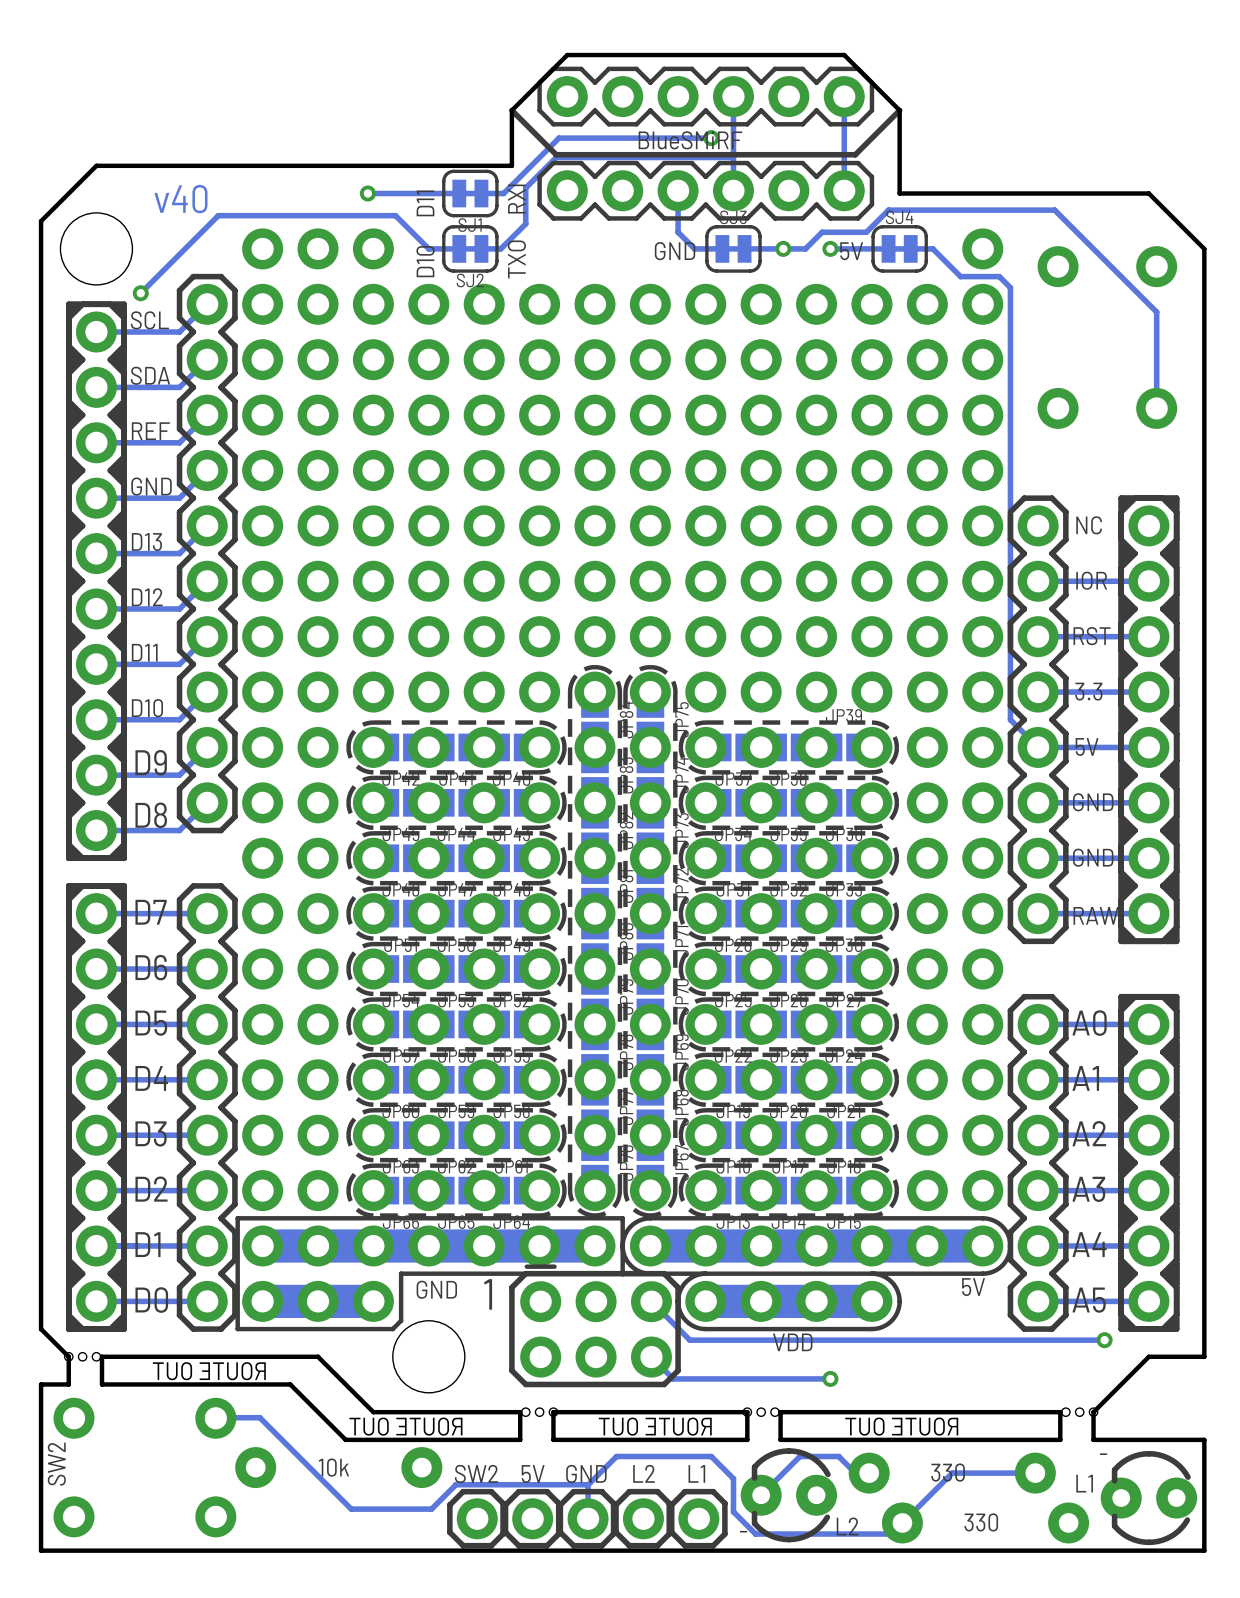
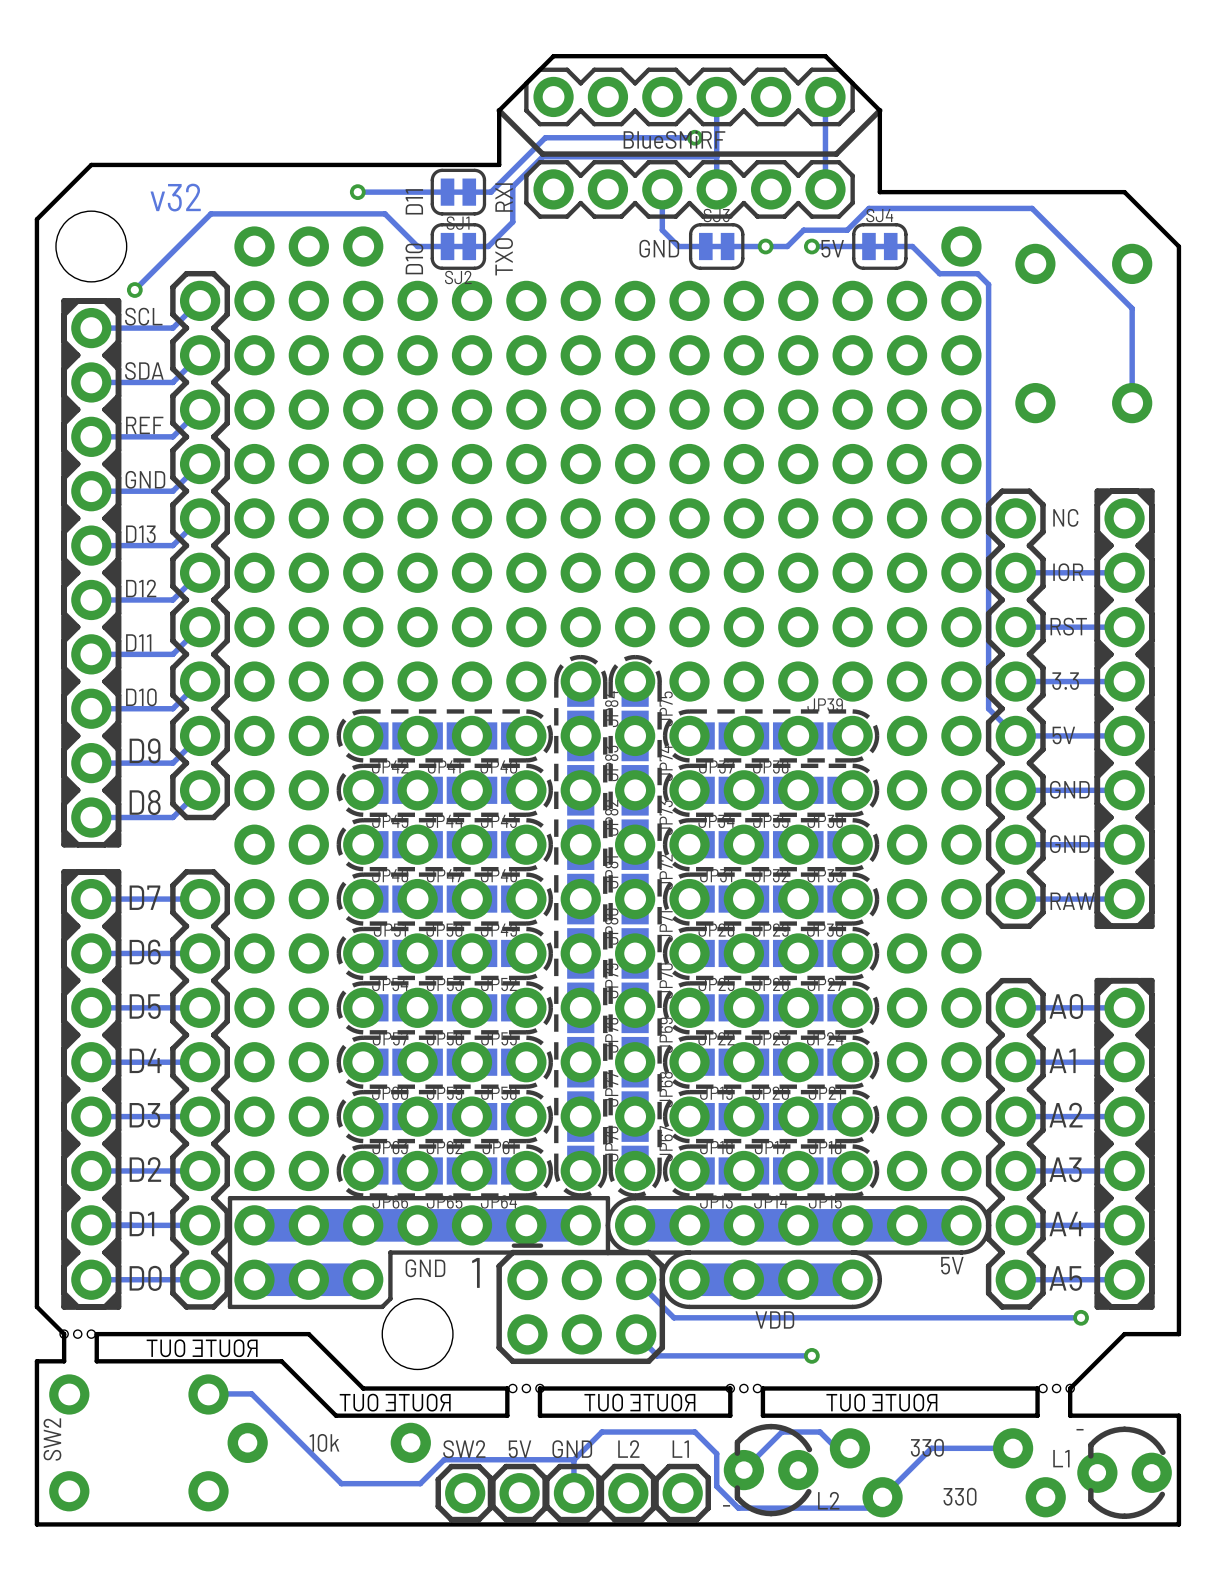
text: v40 (180, 199) -> v32 (175, 197)

